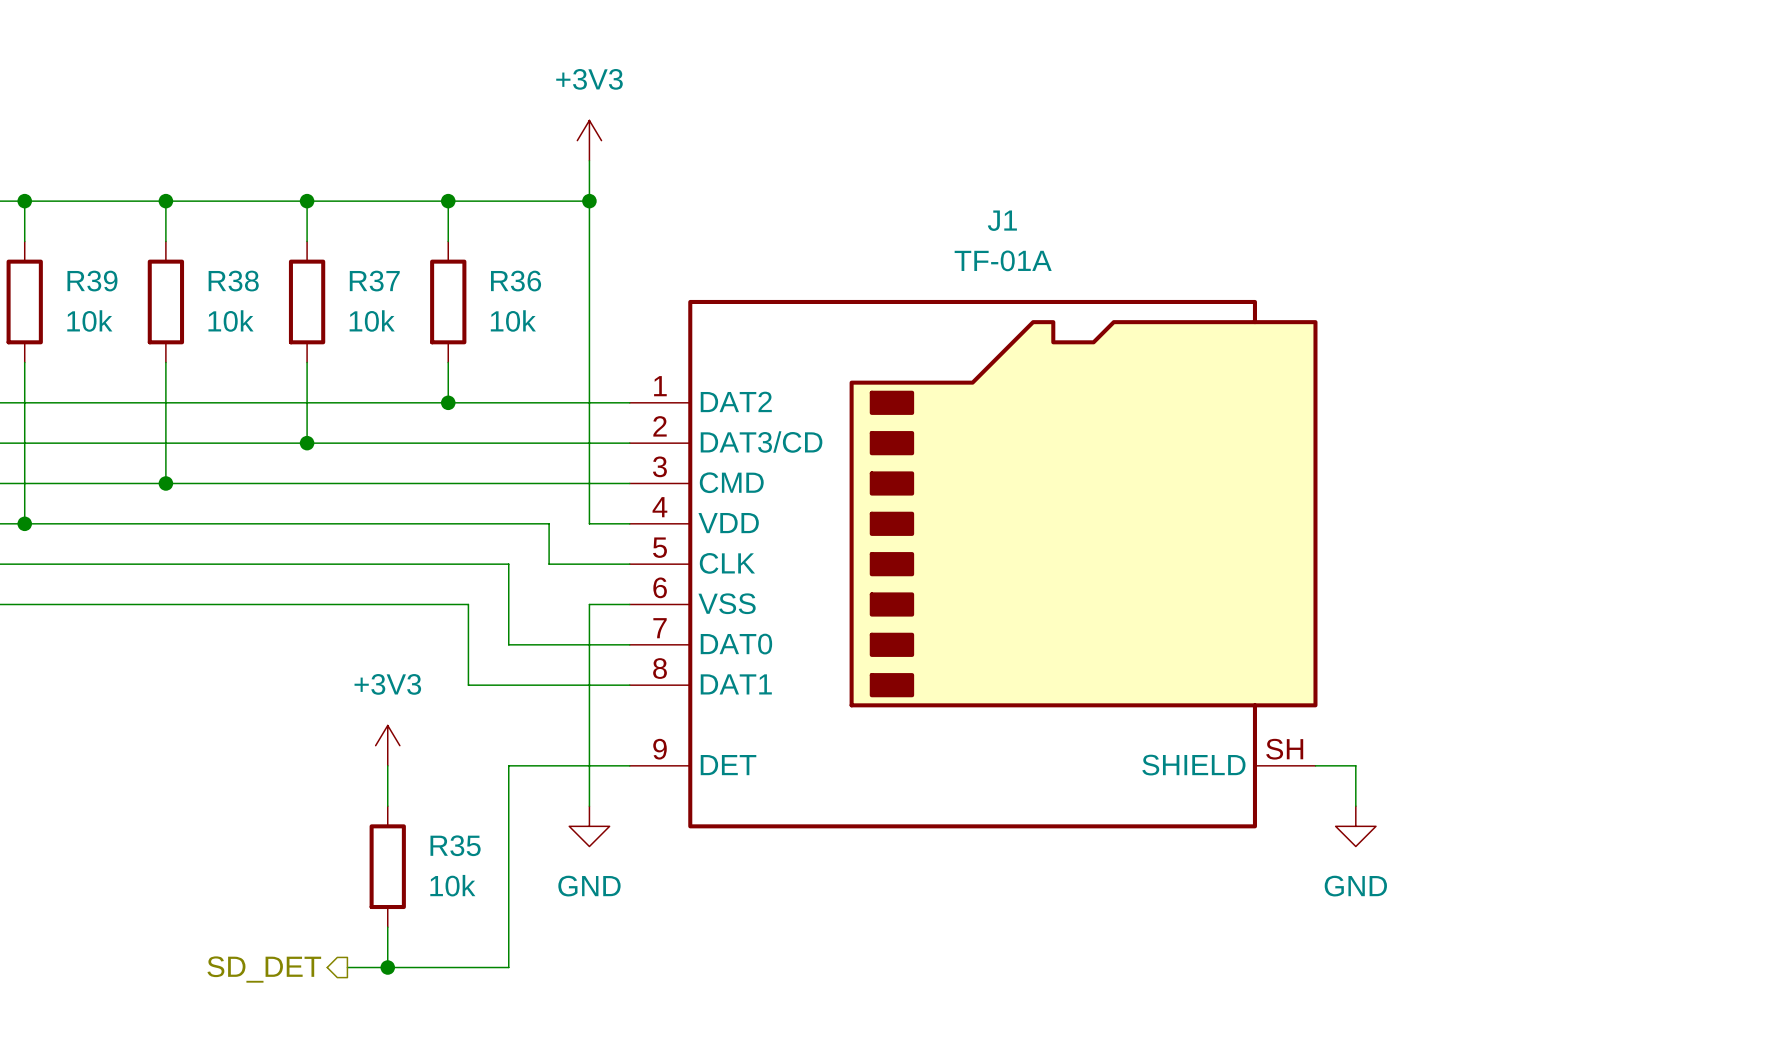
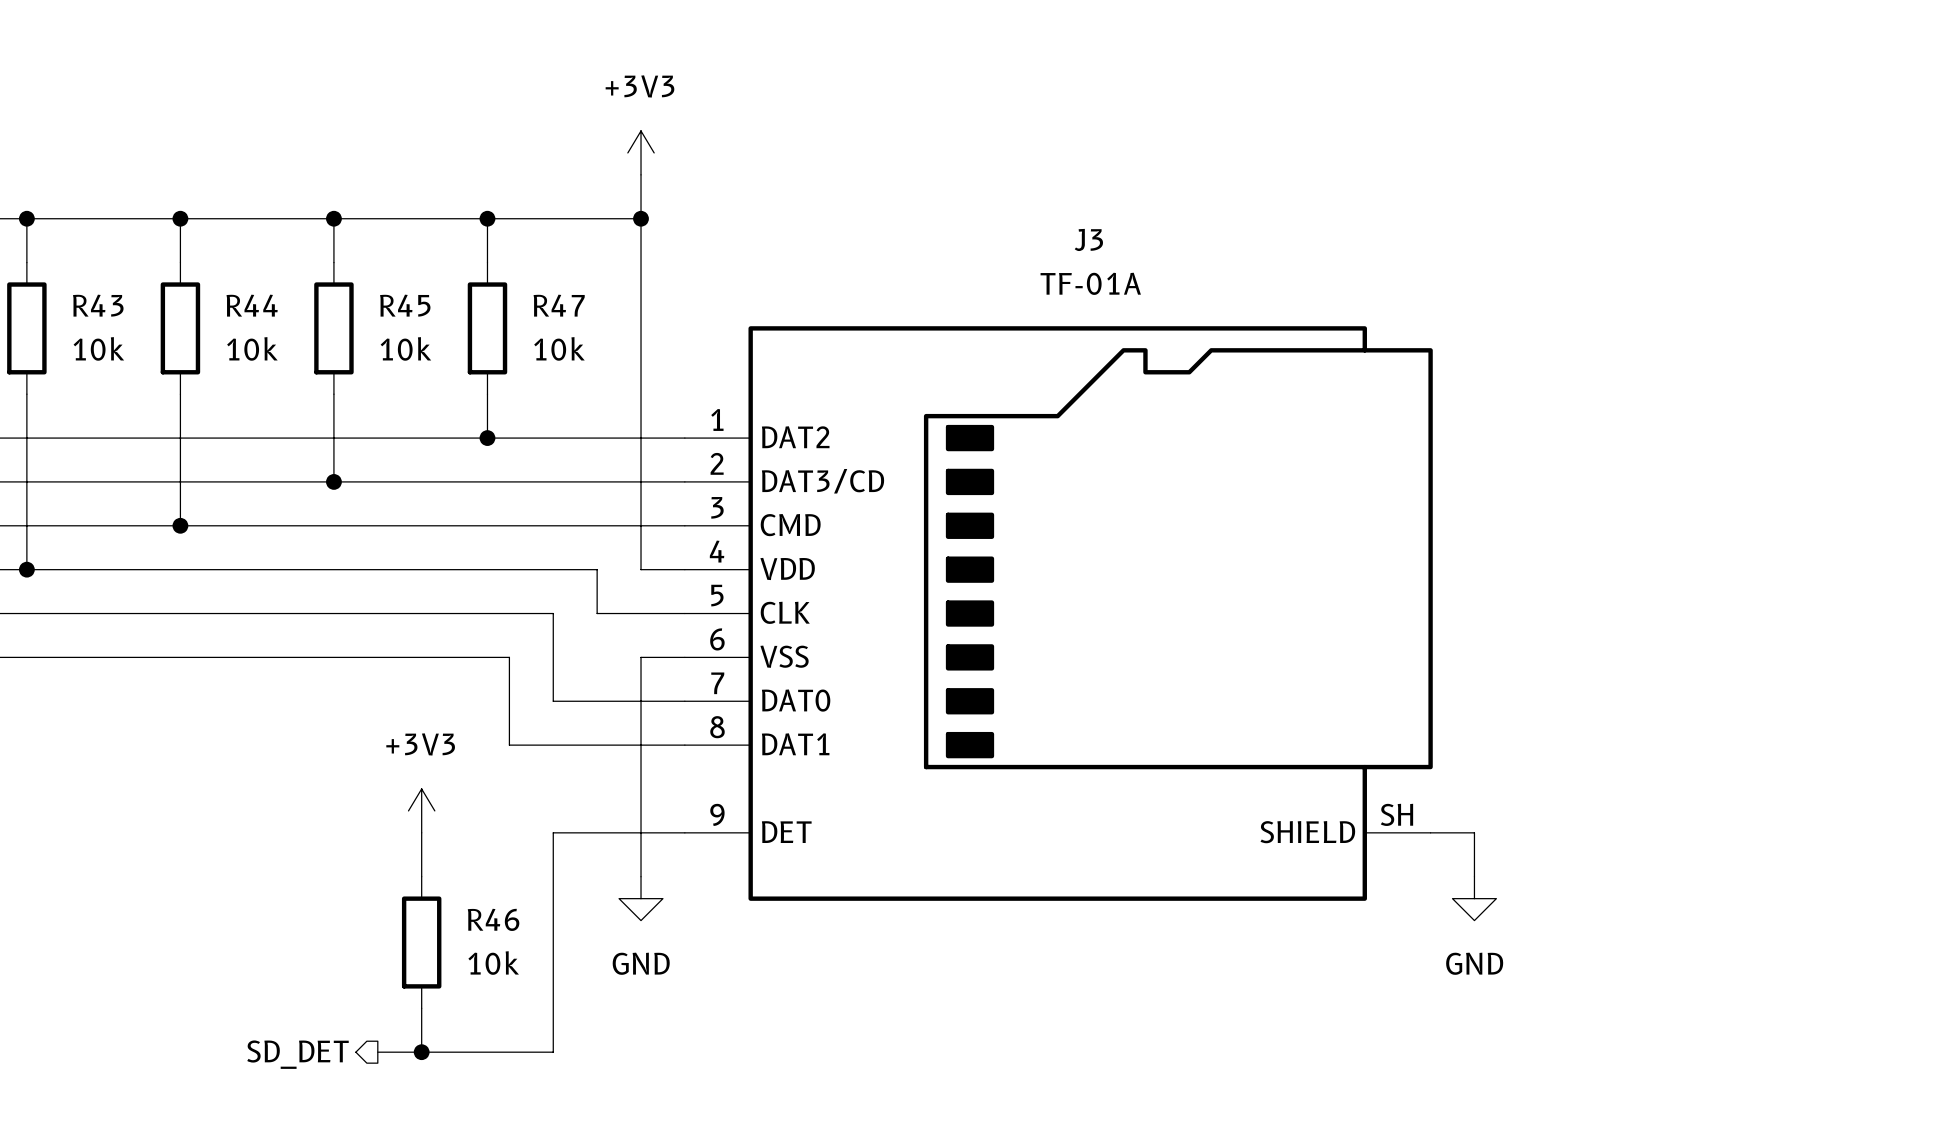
J1 name: J1 (1002, 220) -> J3 (1088, 239)
R39 name: R39 (92, 281) -> R43 (98, 305)
R38 name: R38 (233, 281) -> R44 (252, 305)
R37 name: R37 (374, 281) -> R45 (405, 305)
R36 name: R36 (516, 281) -> R47 (559, 305)
R35 name: R35 (455, 845) -> R46 (493, 919)

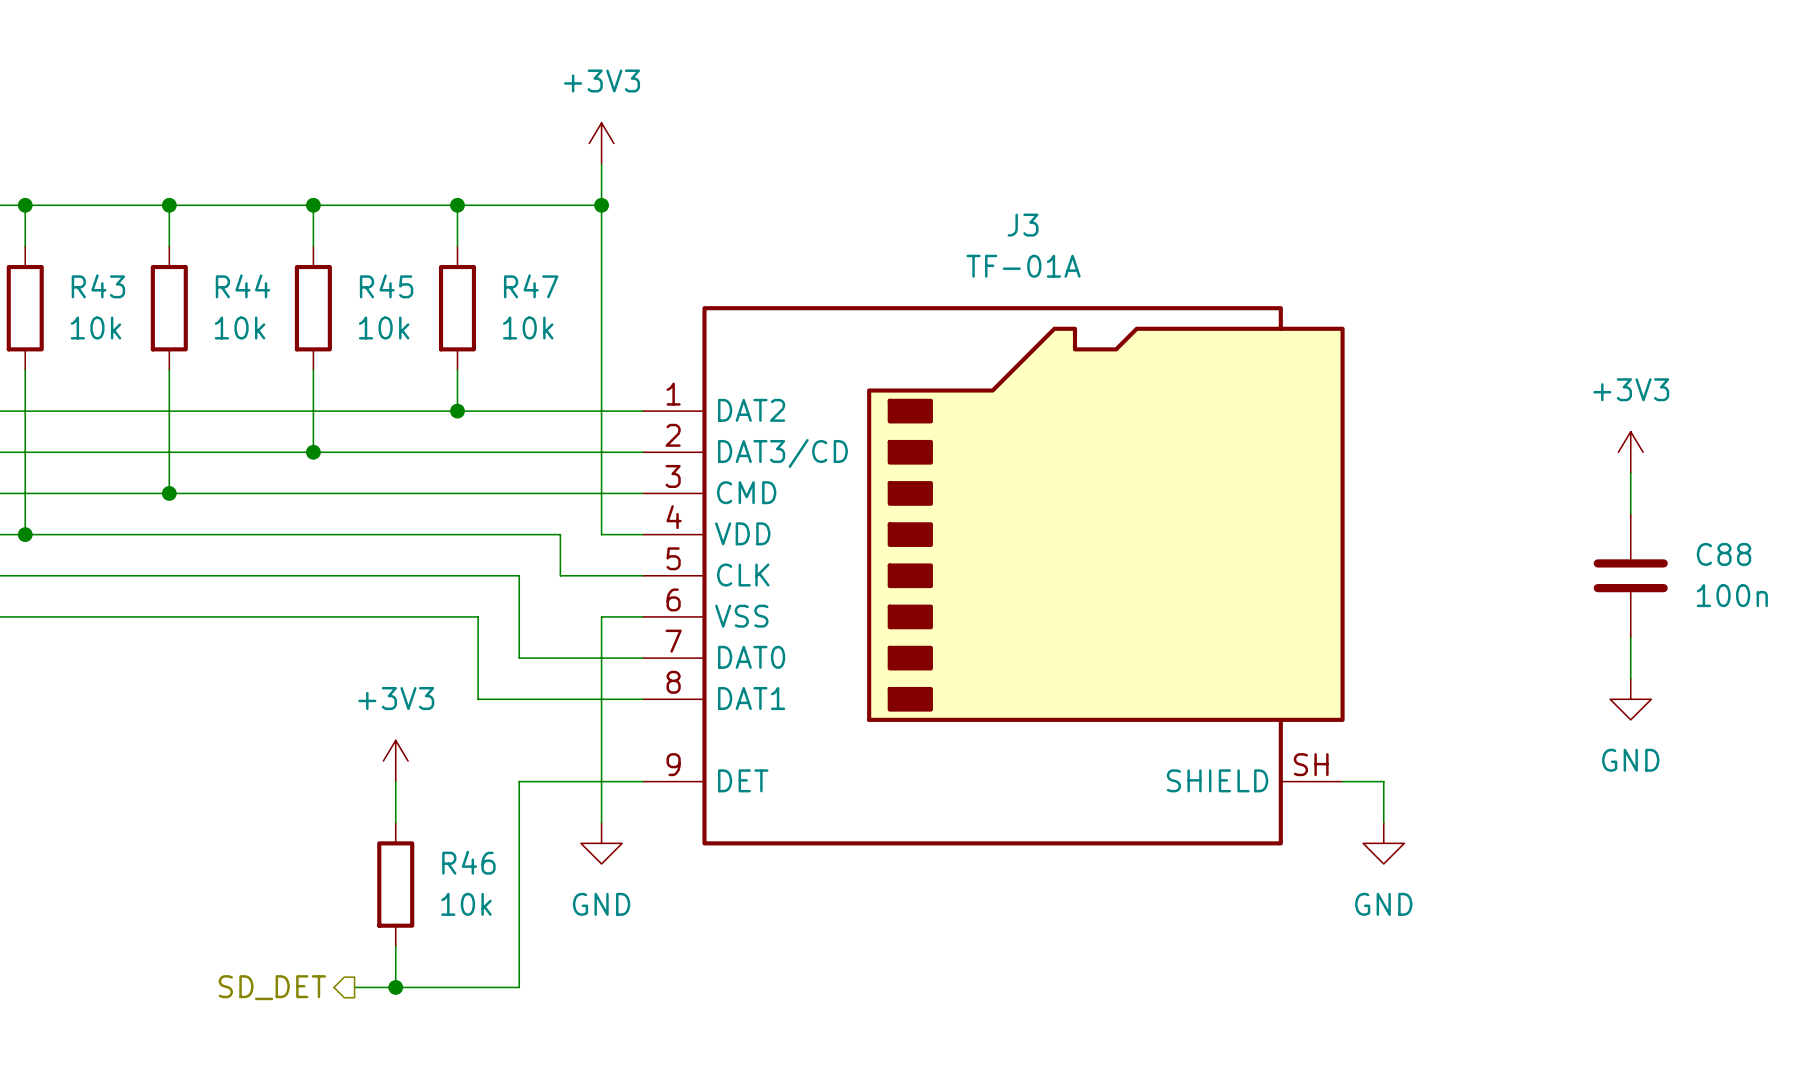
power symbol: none -> +3V3 (1630, 452)
wire: none -> (1630, 472) (1630, 514)
C88: none -> 100n (1630, 575)
wire: none -> (1630, 637) (1630, 678)
power symbol: none -> GND (1630, 699)

